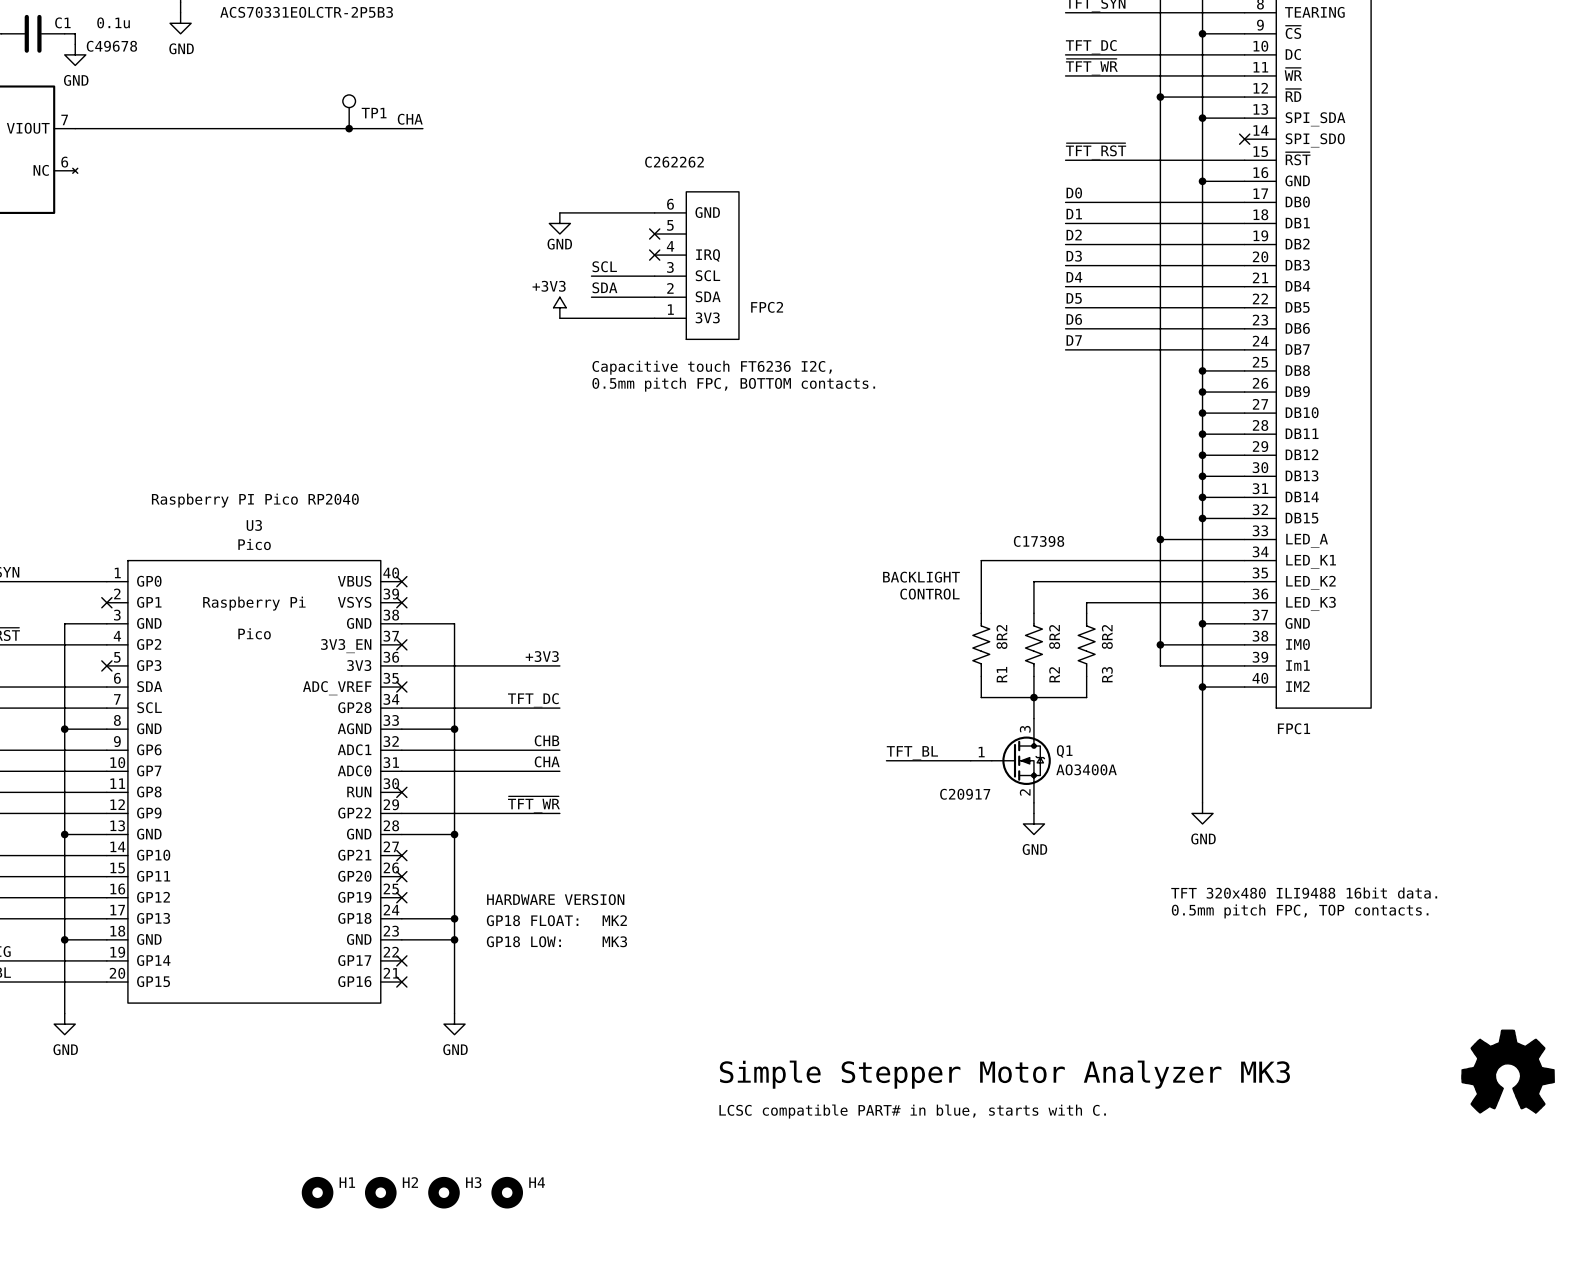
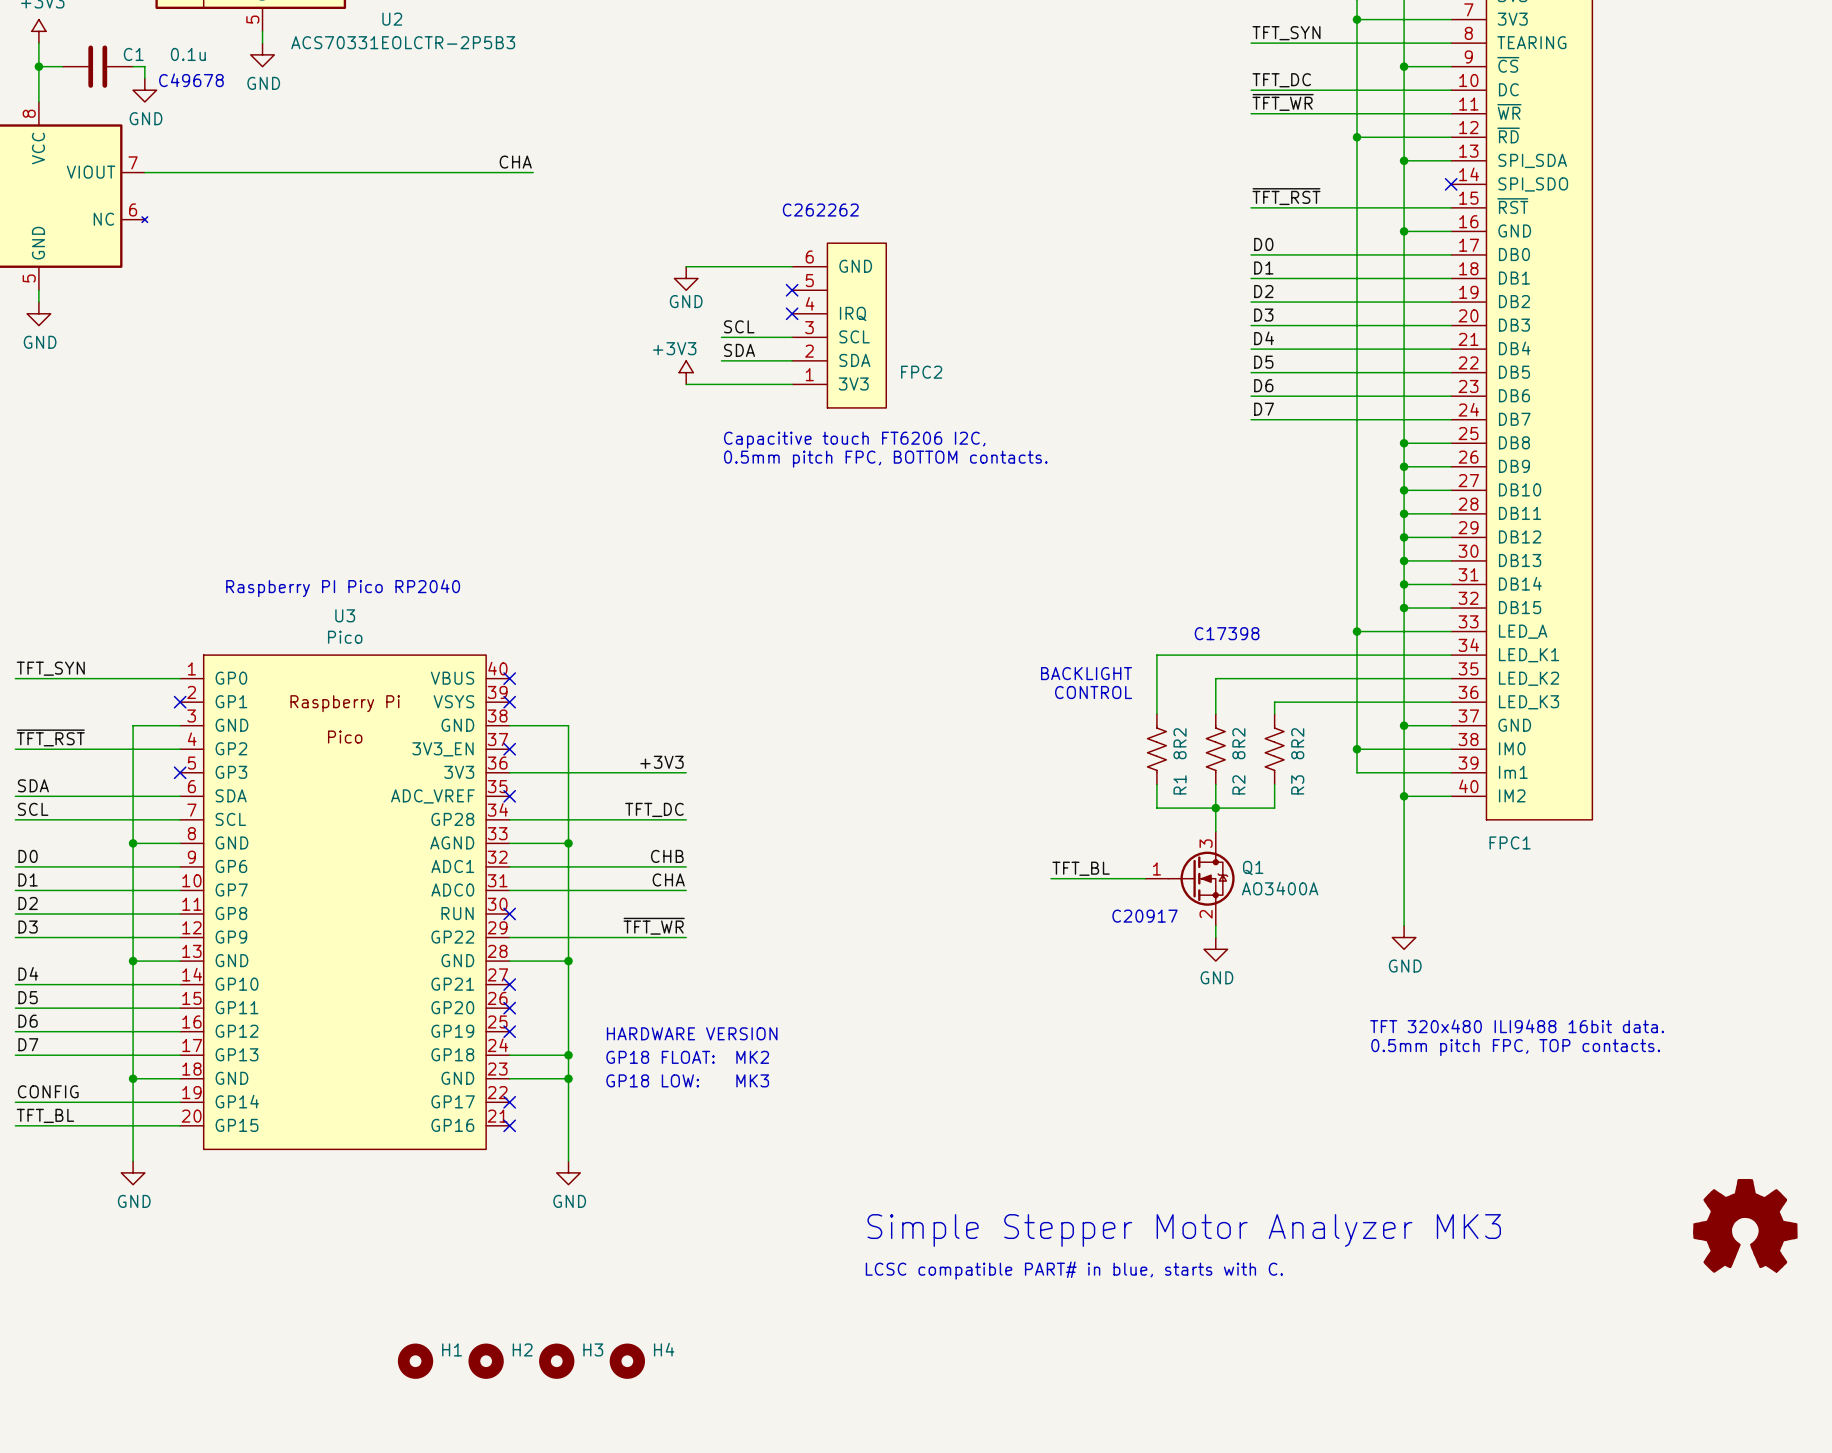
TP1: (349, 111) -> none
junction: (349, 128) -> none
text: Capacitive touch FT6236 I2C, (712, 367) -> Capacitive touch FT6206 I2C, (854, 440)

